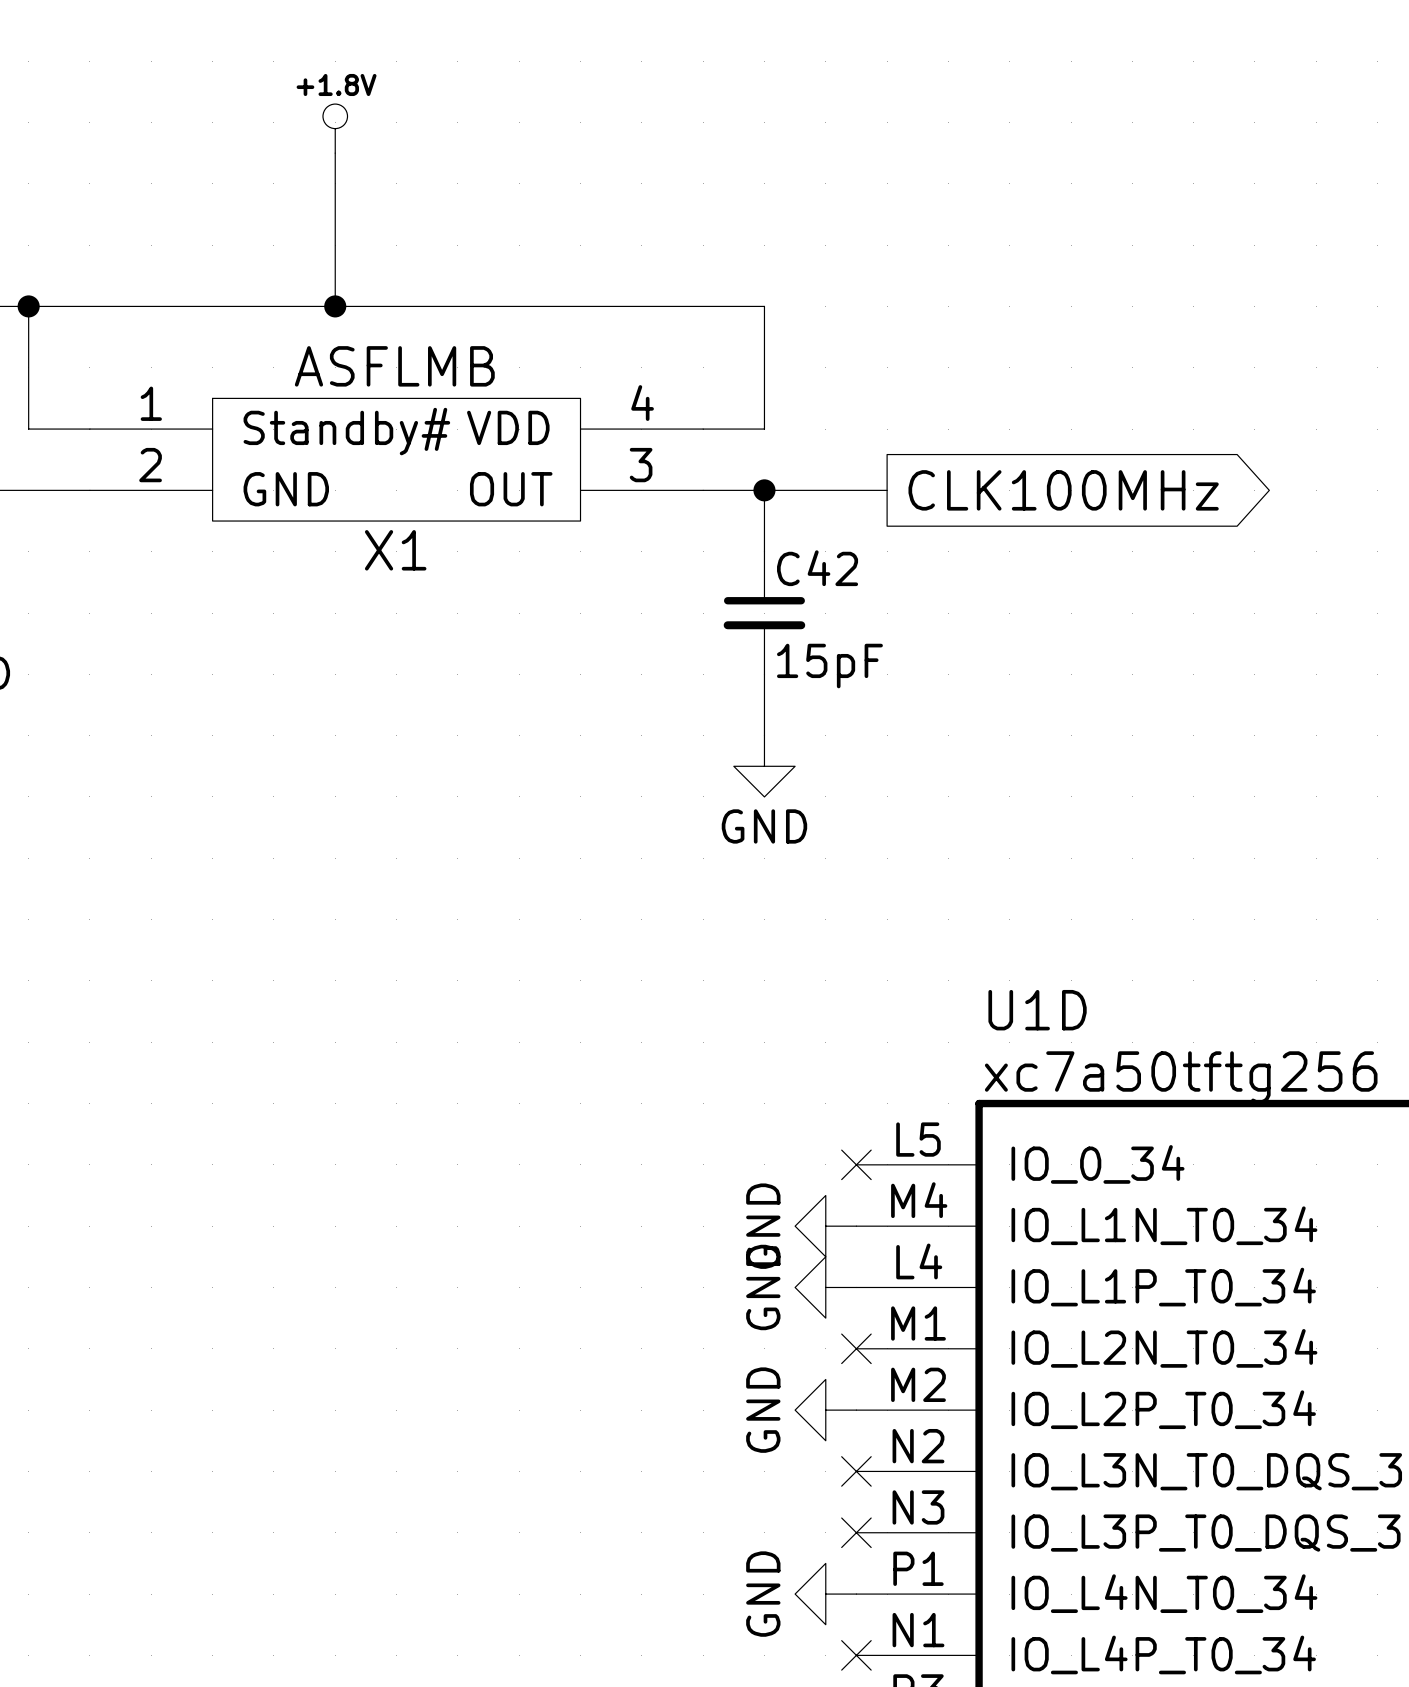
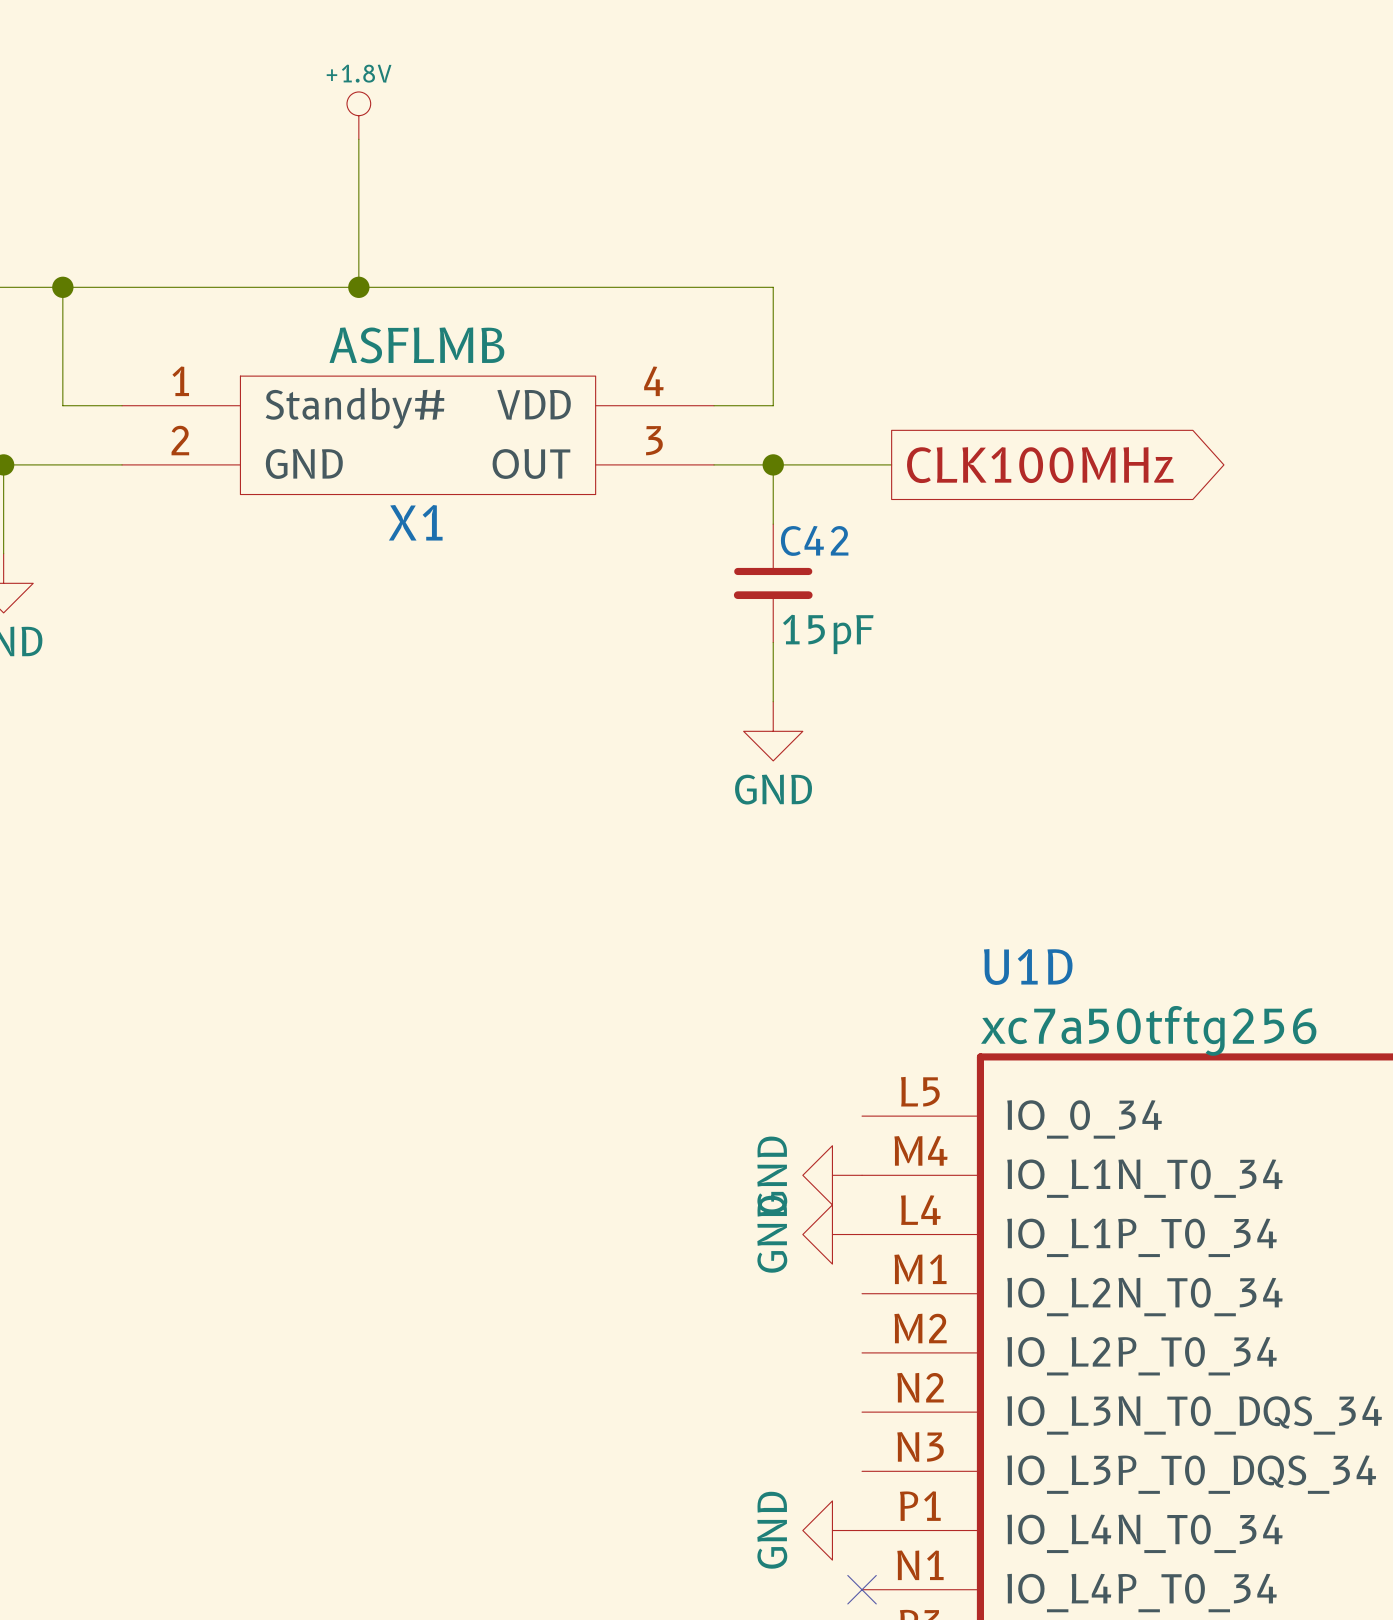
no-connect mark: (856, 1164) -> none
no-connect mark: (856, 1348) -> none
power symbol: GND (825, 1410) -> none
no-connect mark: (856, 1471) -> none
no-connect mark: (856, 1532) -> none

